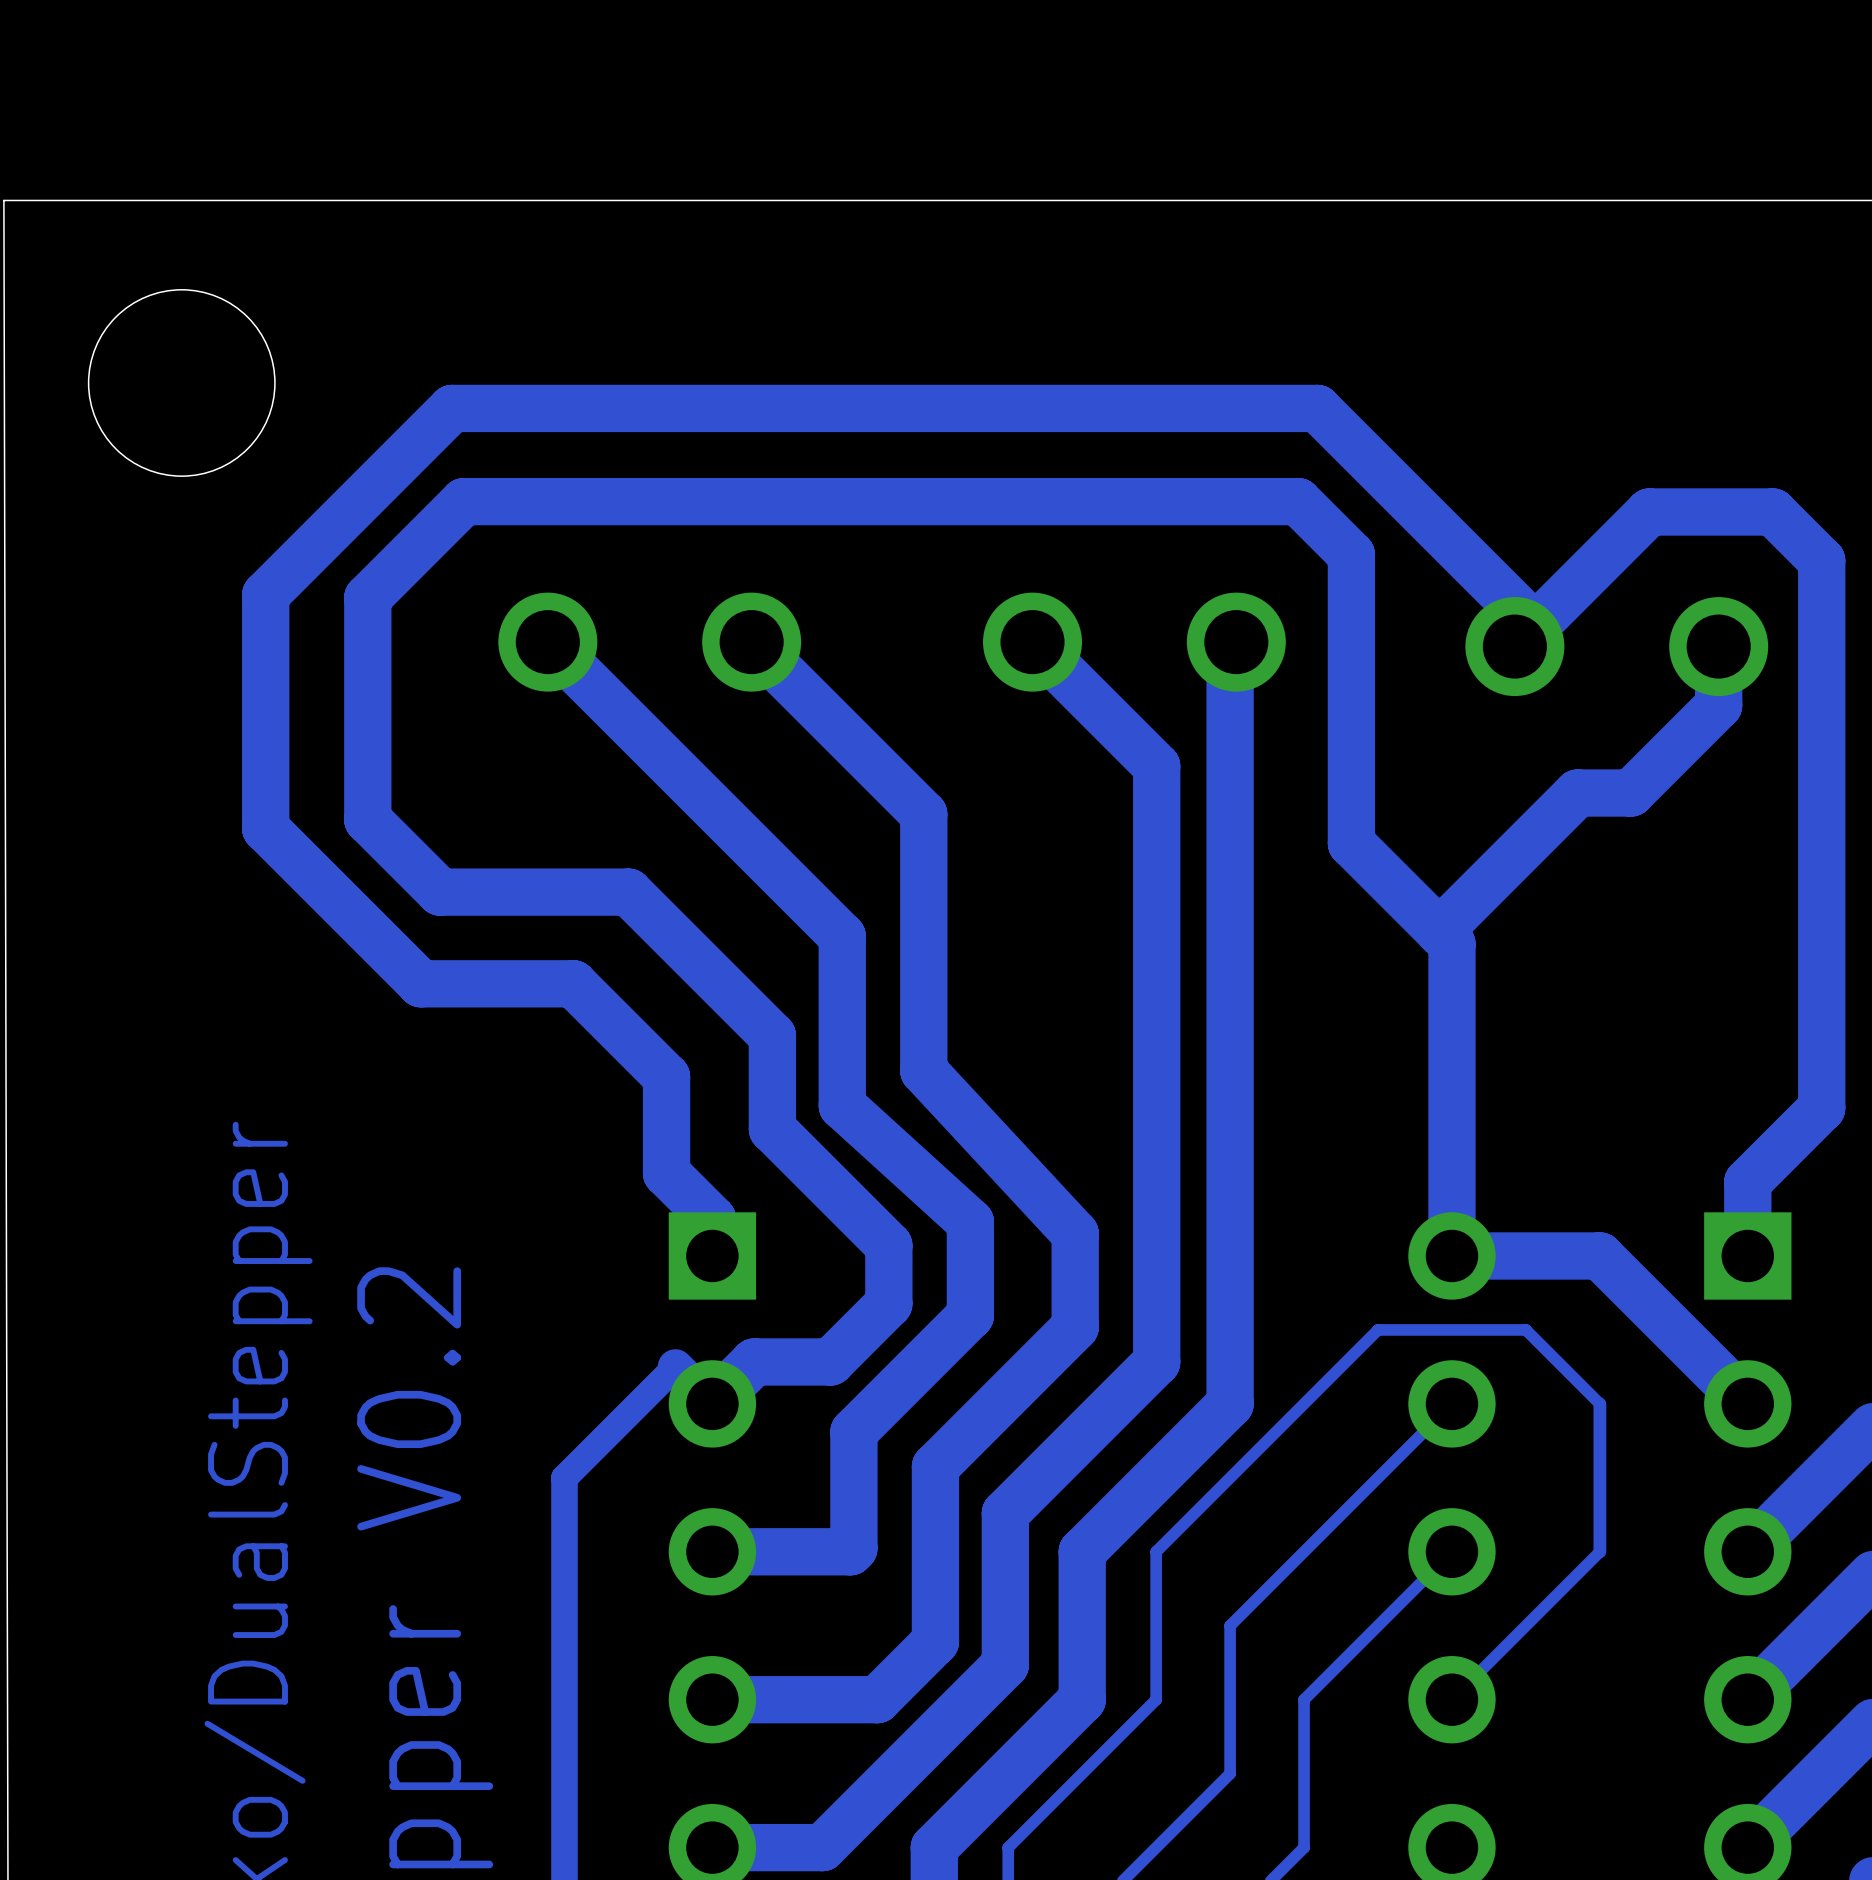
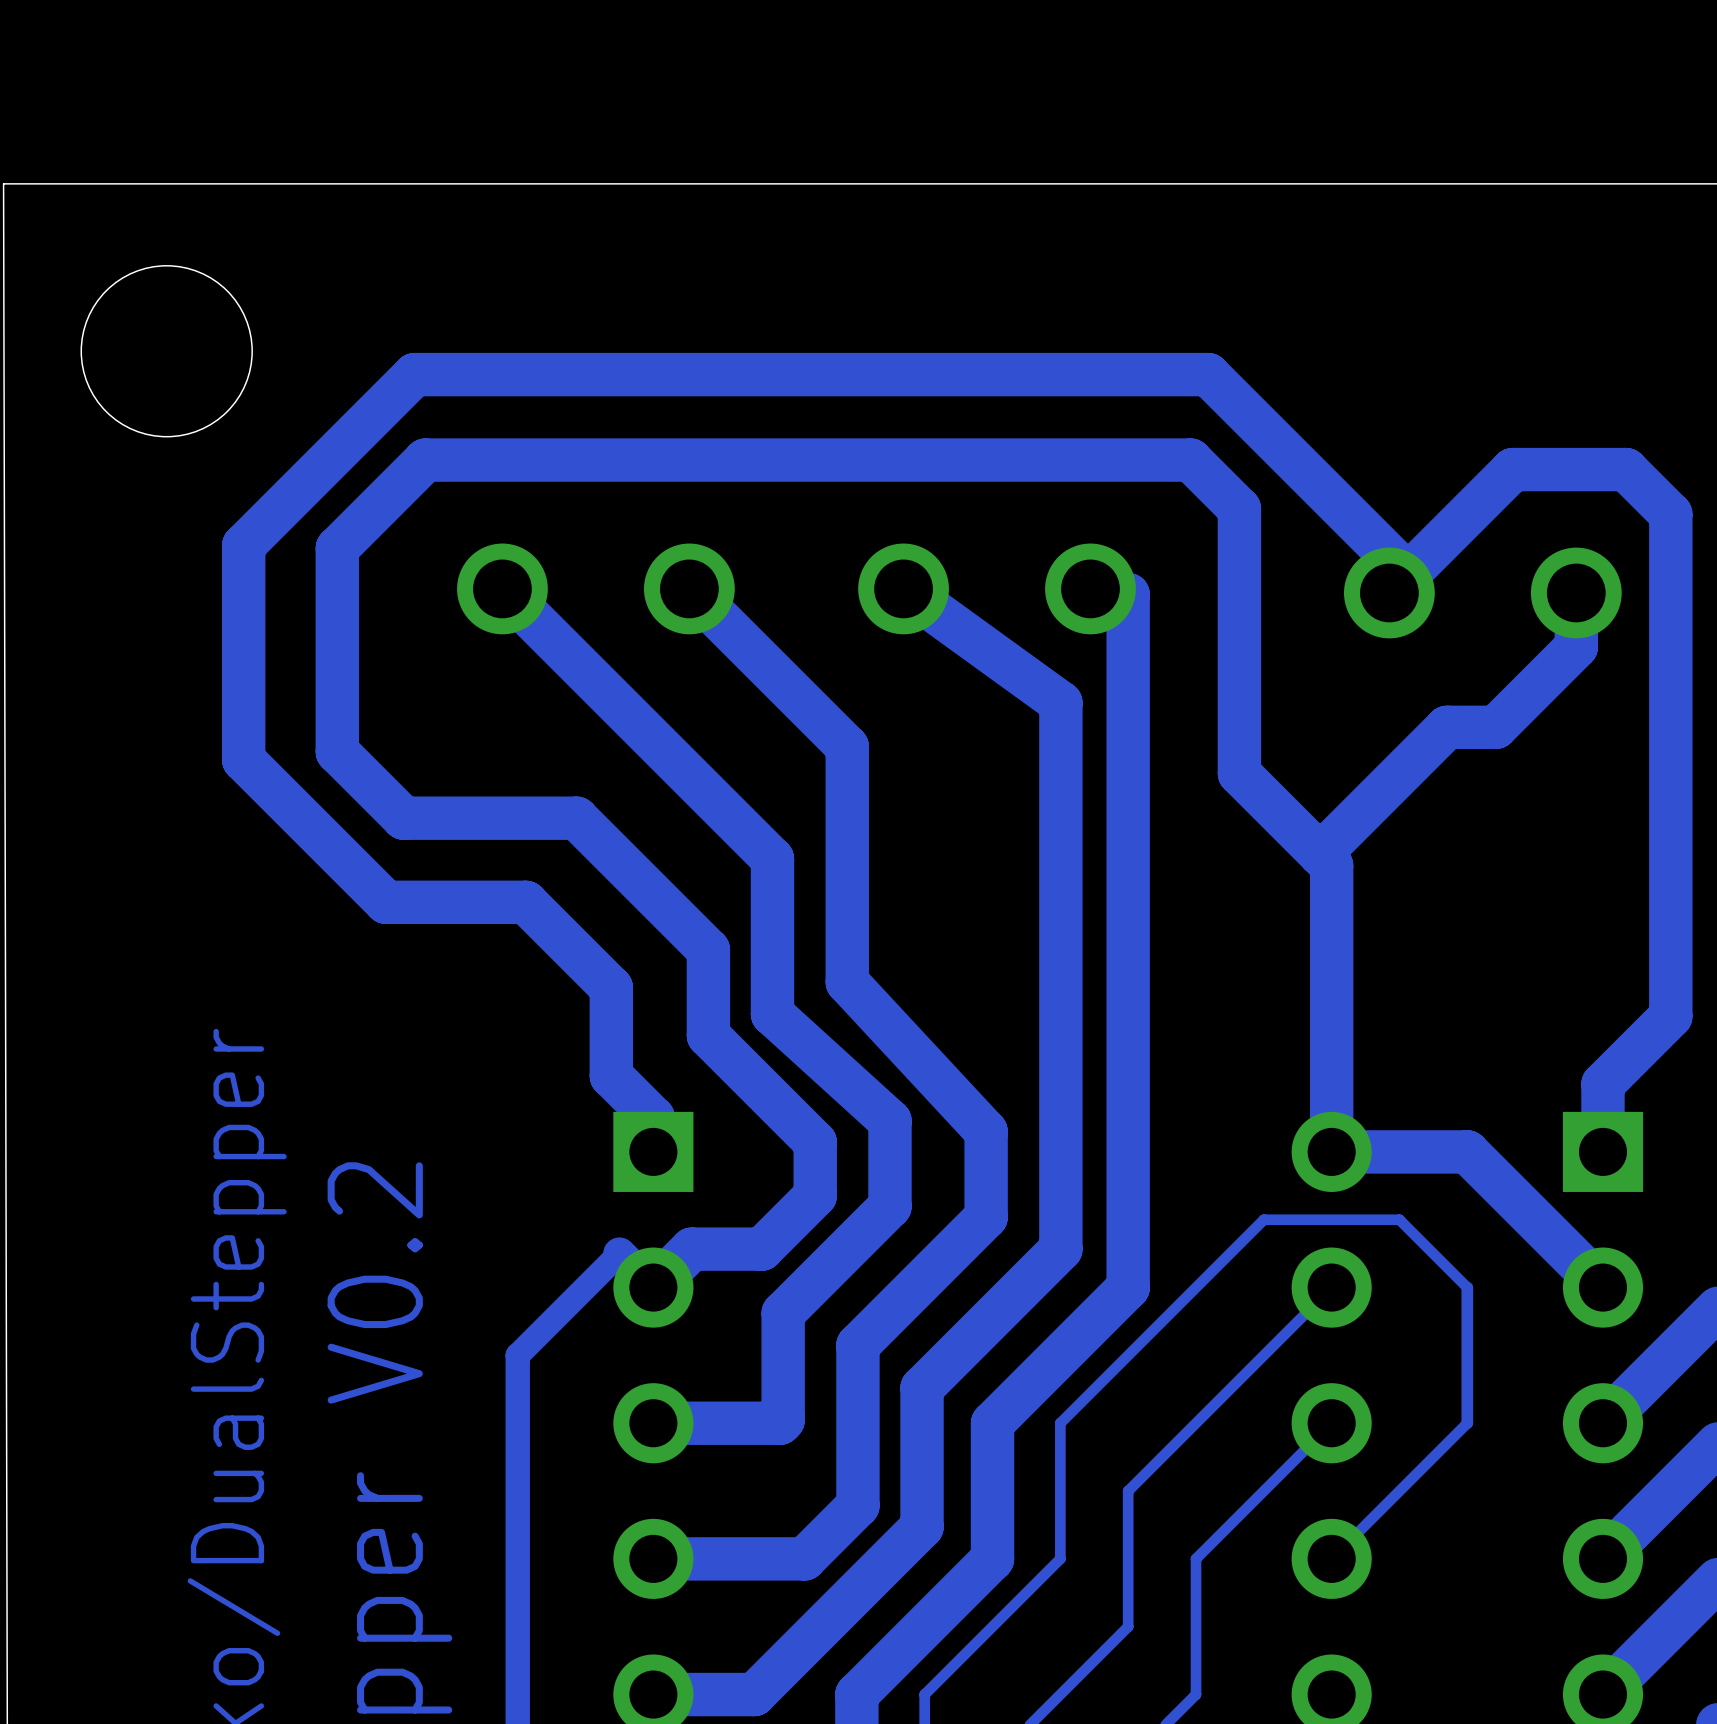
bottom track: (1032, 642) (1156, 766) -> (903, 588) (1060, 702)
part position: (1134, 642) -> (997, 588)

